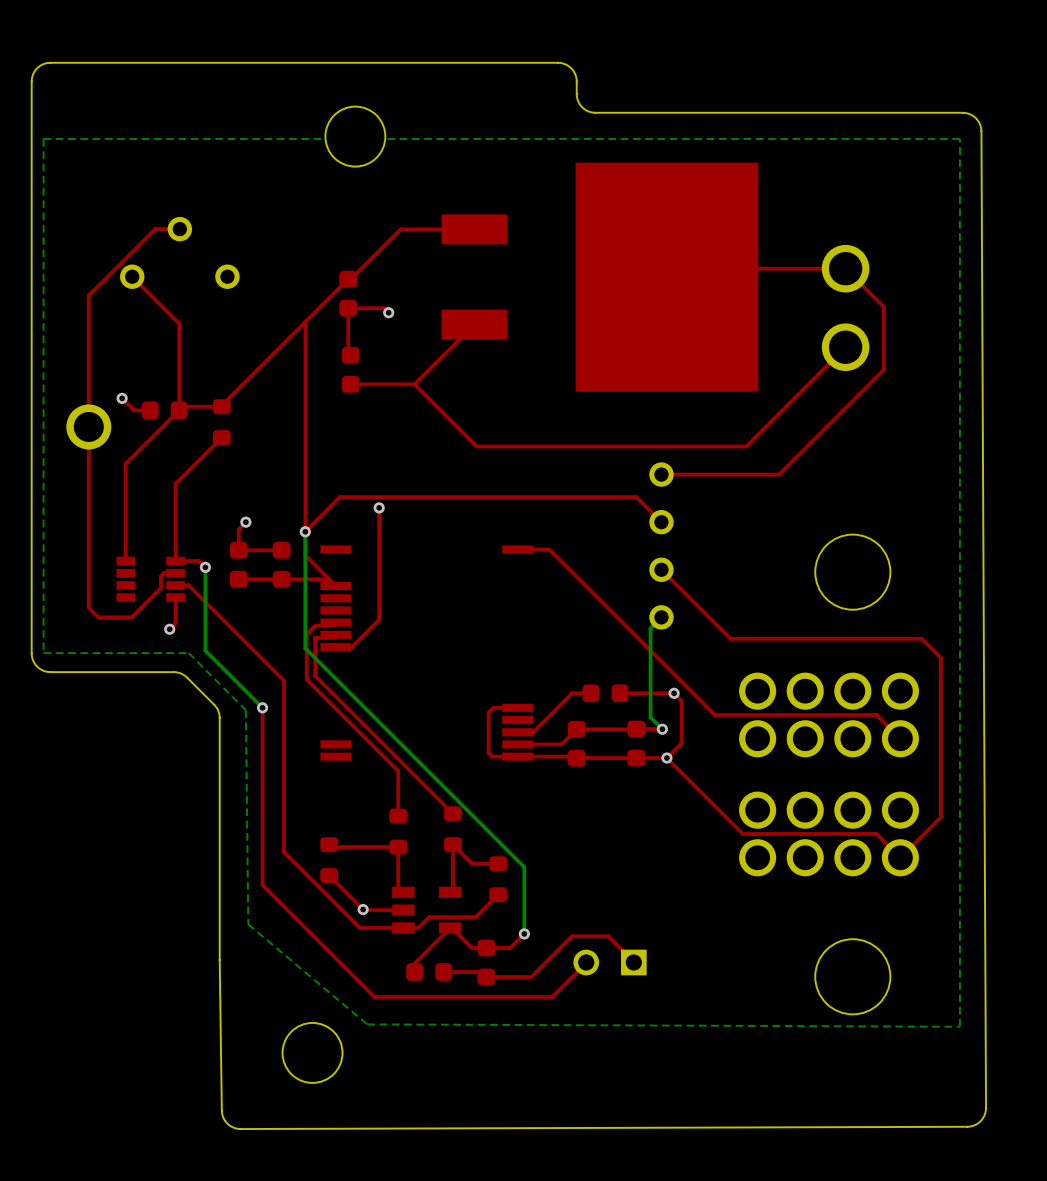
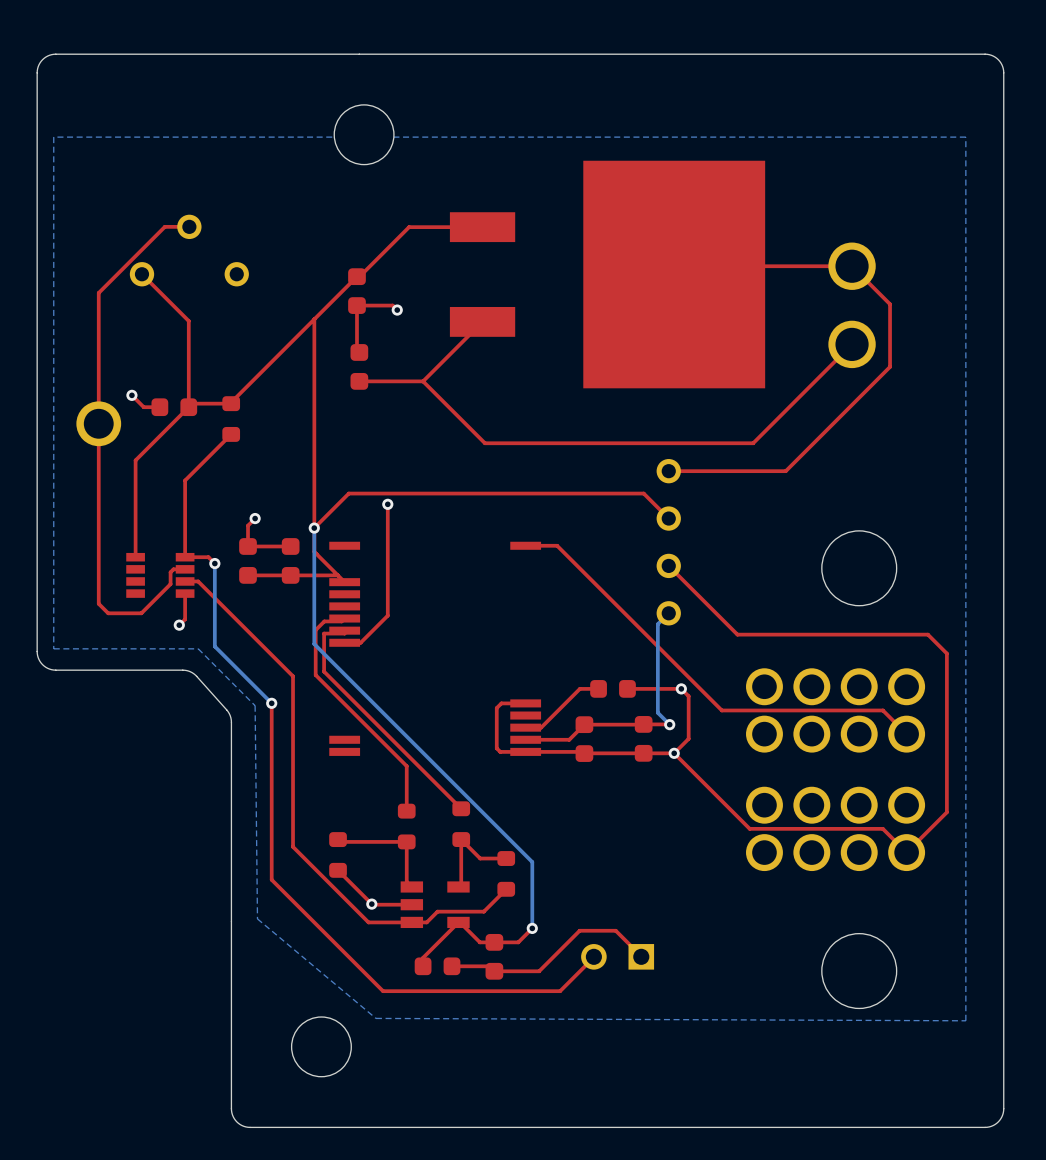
board edge: (557, 62) (50, 62) (42, 64) (35, 69) (31, 81) (32, 659) (38, 668) (48, 671) (179, 672) (187, 677) (218, 710) (221, 1110) (224, 1119) (231, 1126) (240, 1129) (973, 1125) (983, 1117) (986, 1107) (979, 124) (972, 115) (962, 112) (593, 112) (583, 108) (578, 102) (576, 77) (572, 69) (566, 64) (557, 62) -> (985, 54) (998, 59) (1003, 72) (1003, 1108) (1000, 1118) (993, 1125) (985, 1127) (250, 1127) (240, 1124) (234, 1118) (231, 1108) (230, 715) (196, 676) (188, 671) (53, 670) (42, 664) (37, 655) (37, 72) (40, 62) (45, 57) (55, 54) (985, 54)

